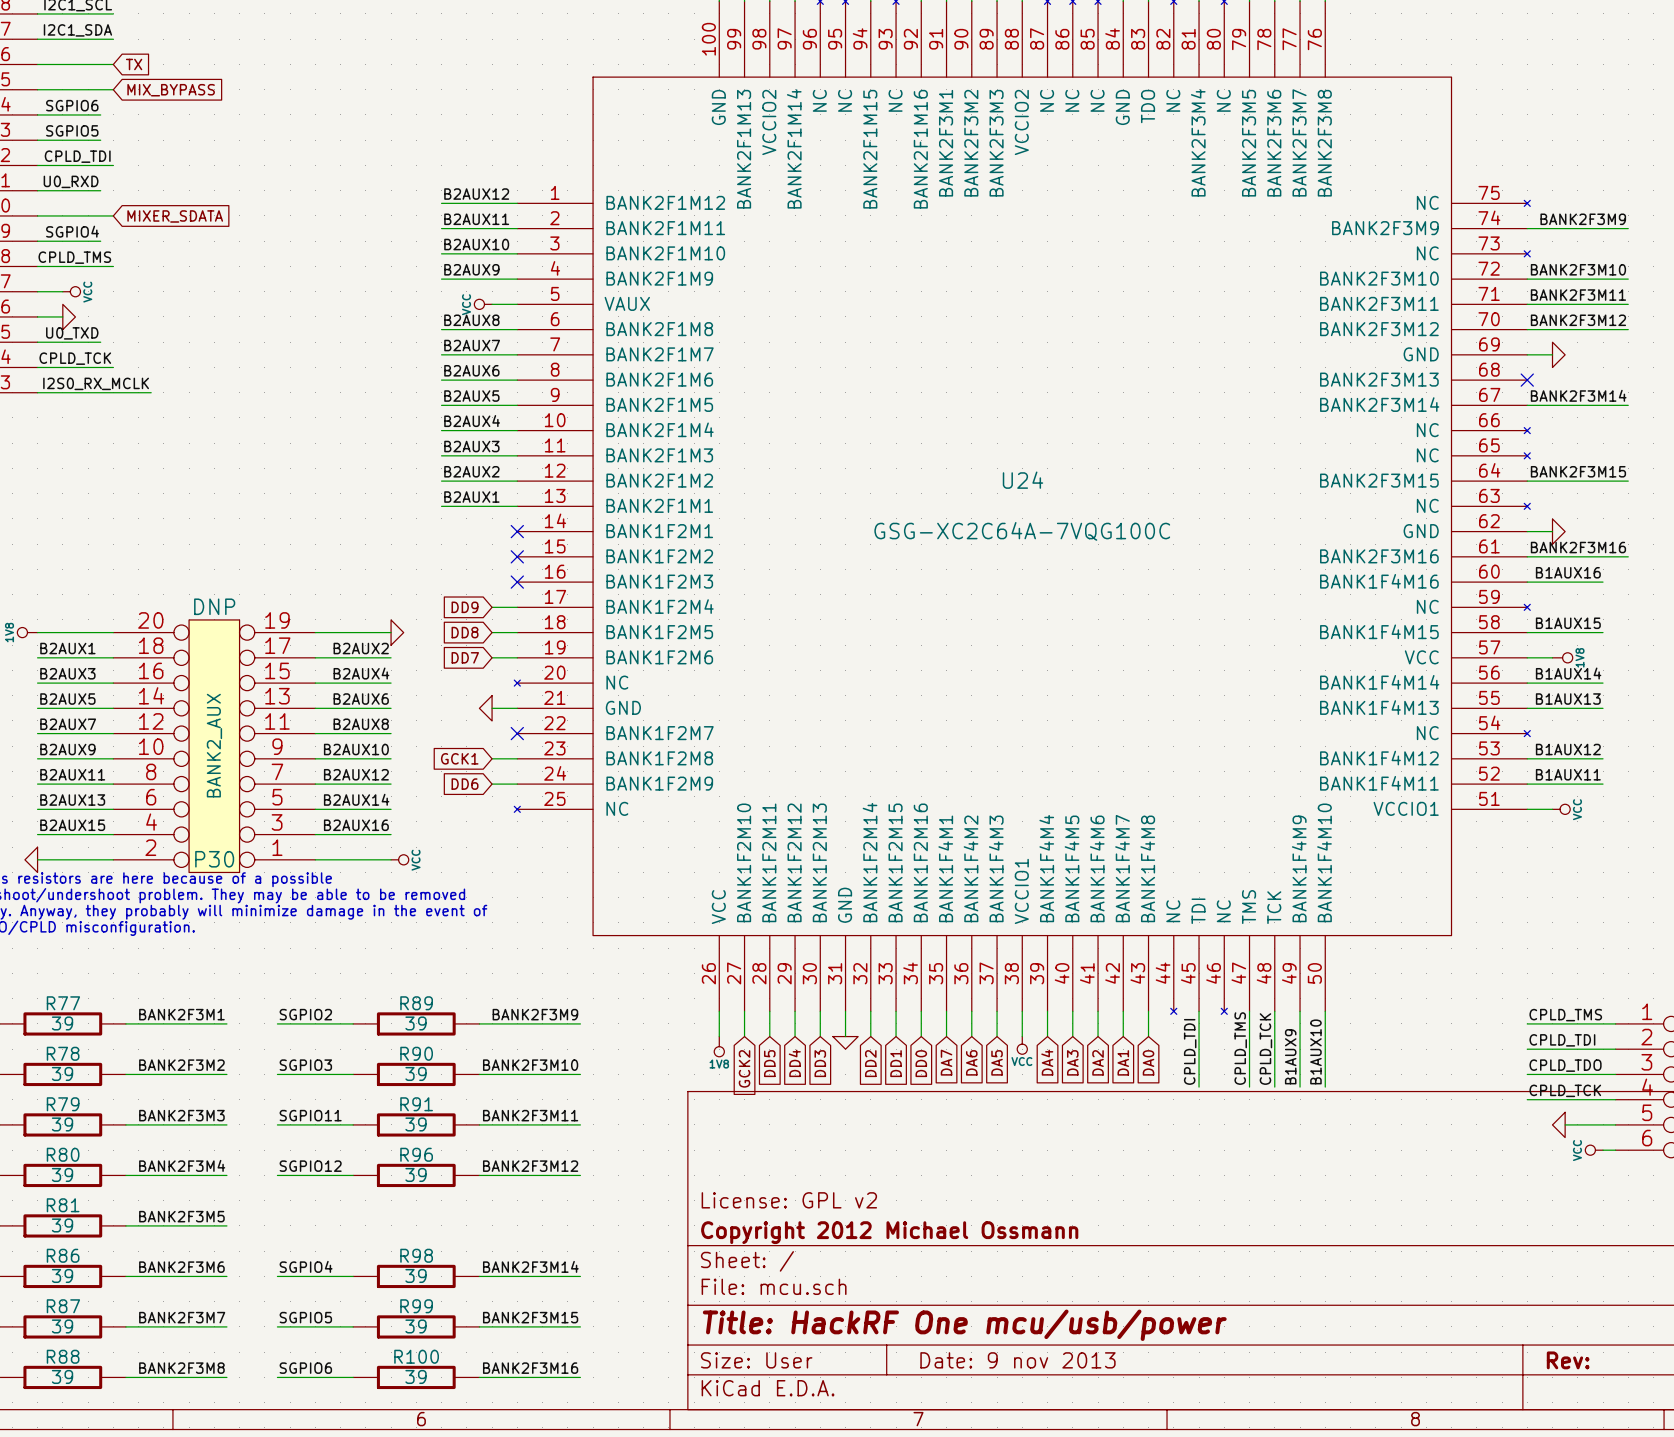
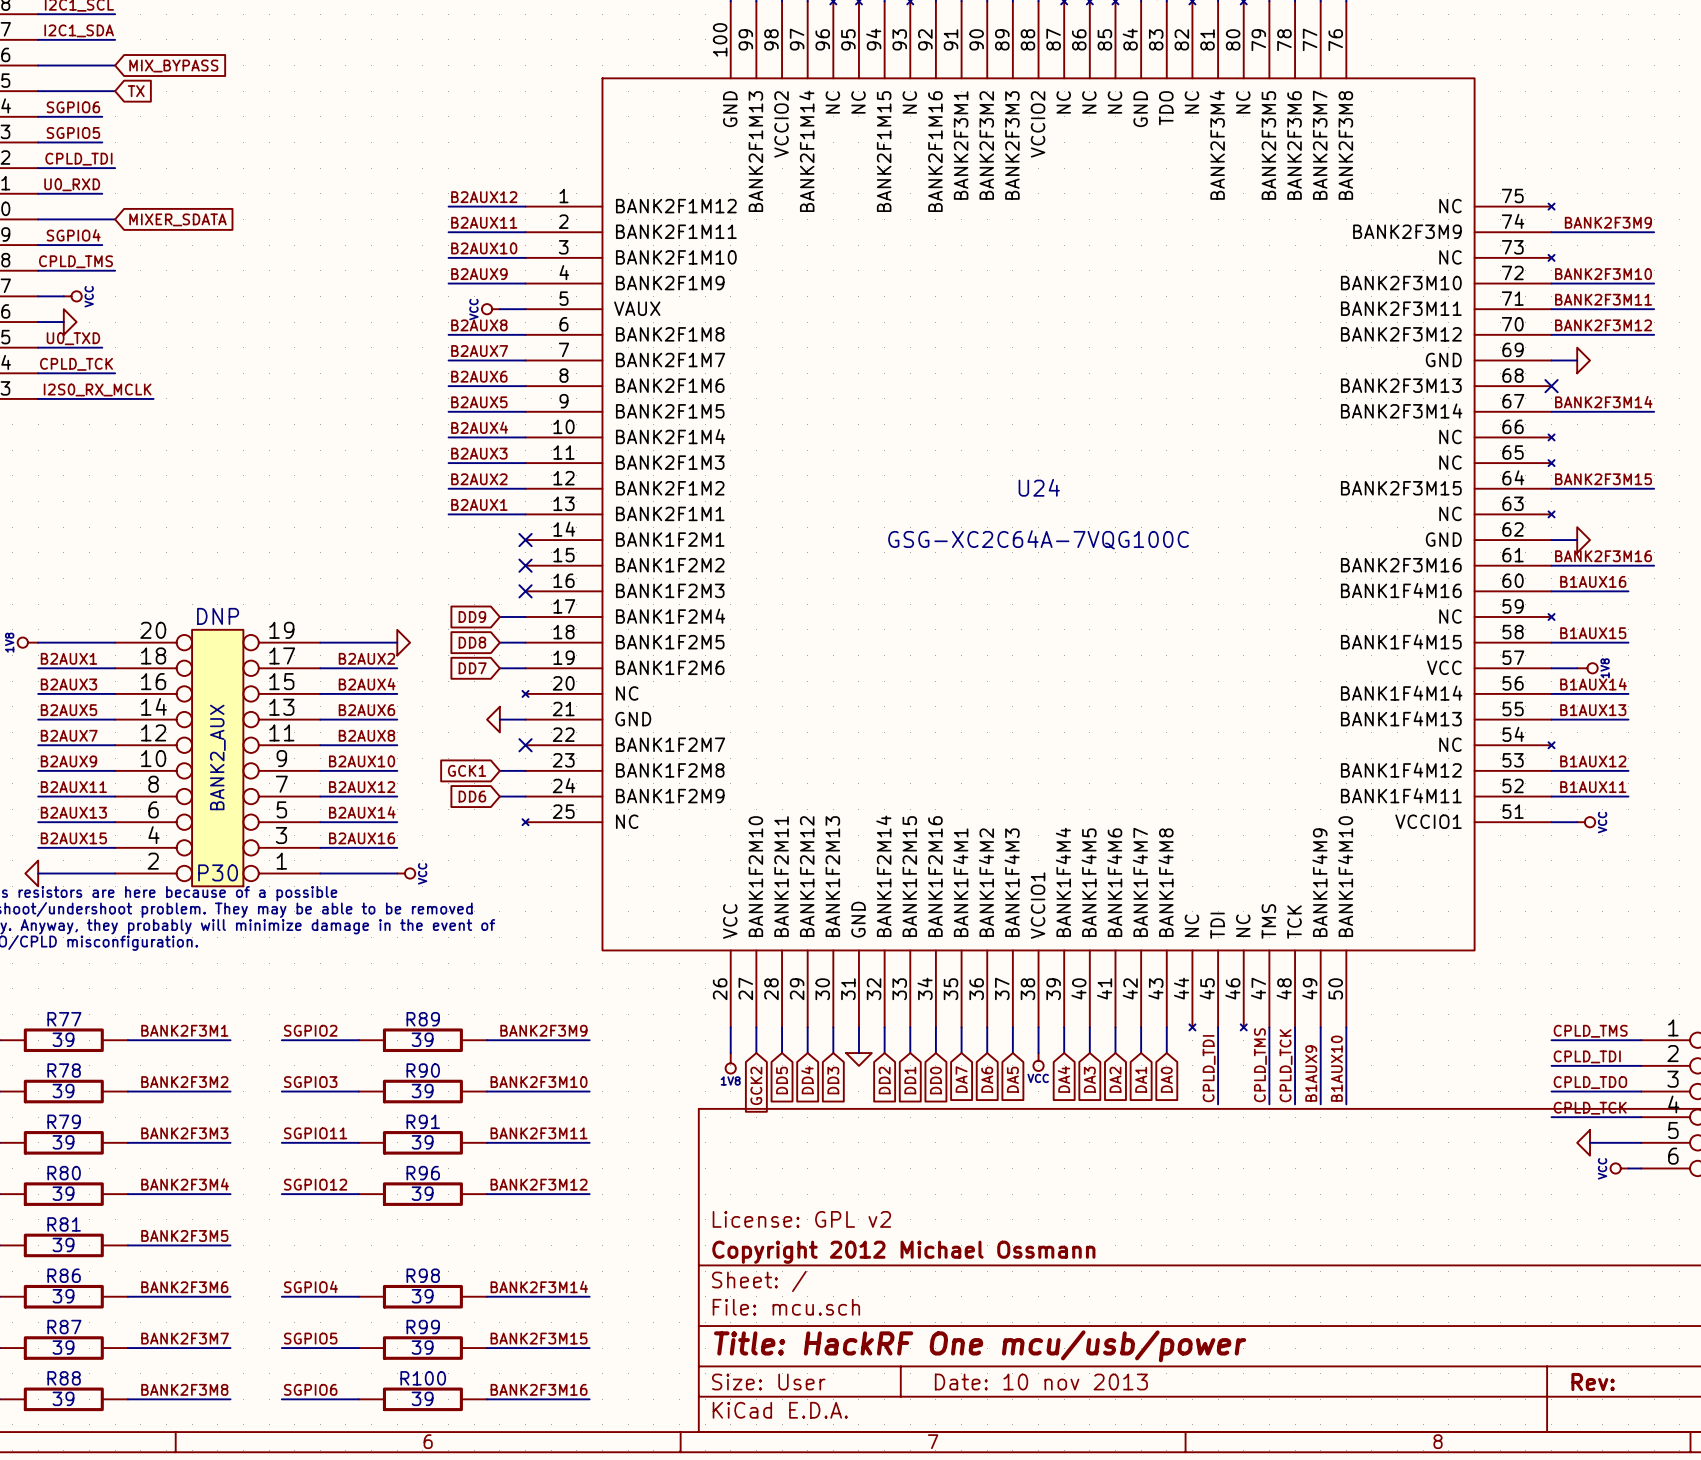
global label: TX (134, 64) -> MIX_BYPASS (173, 66)
global label: MIX_BYPASS (171, 90) -> TX (136, 91)
title block: Date: 9 nov 2013 (1017, 1360) -> Date: 10 nov 2013 (1041, 1382)

